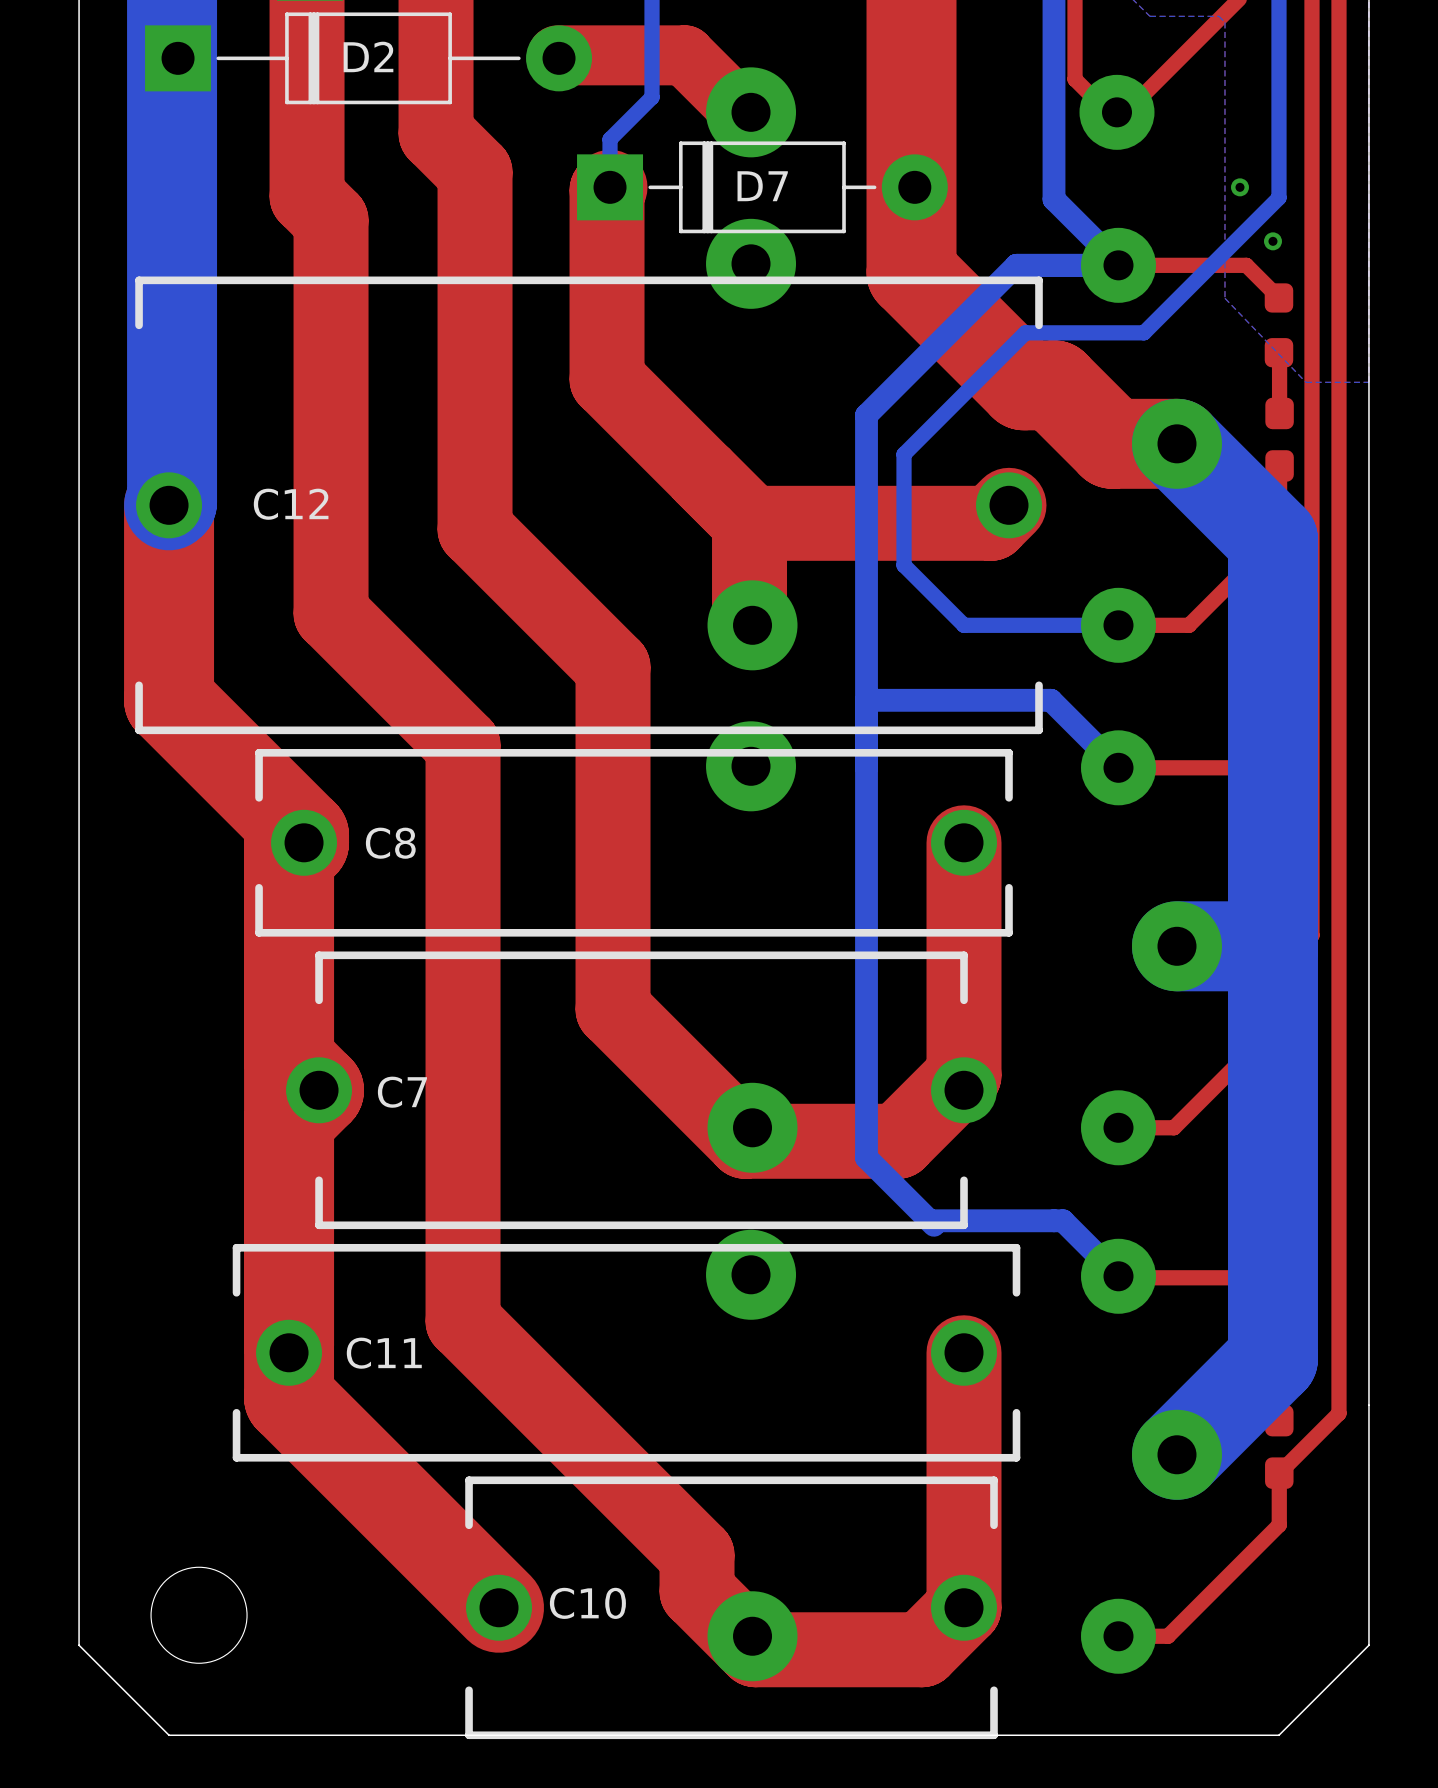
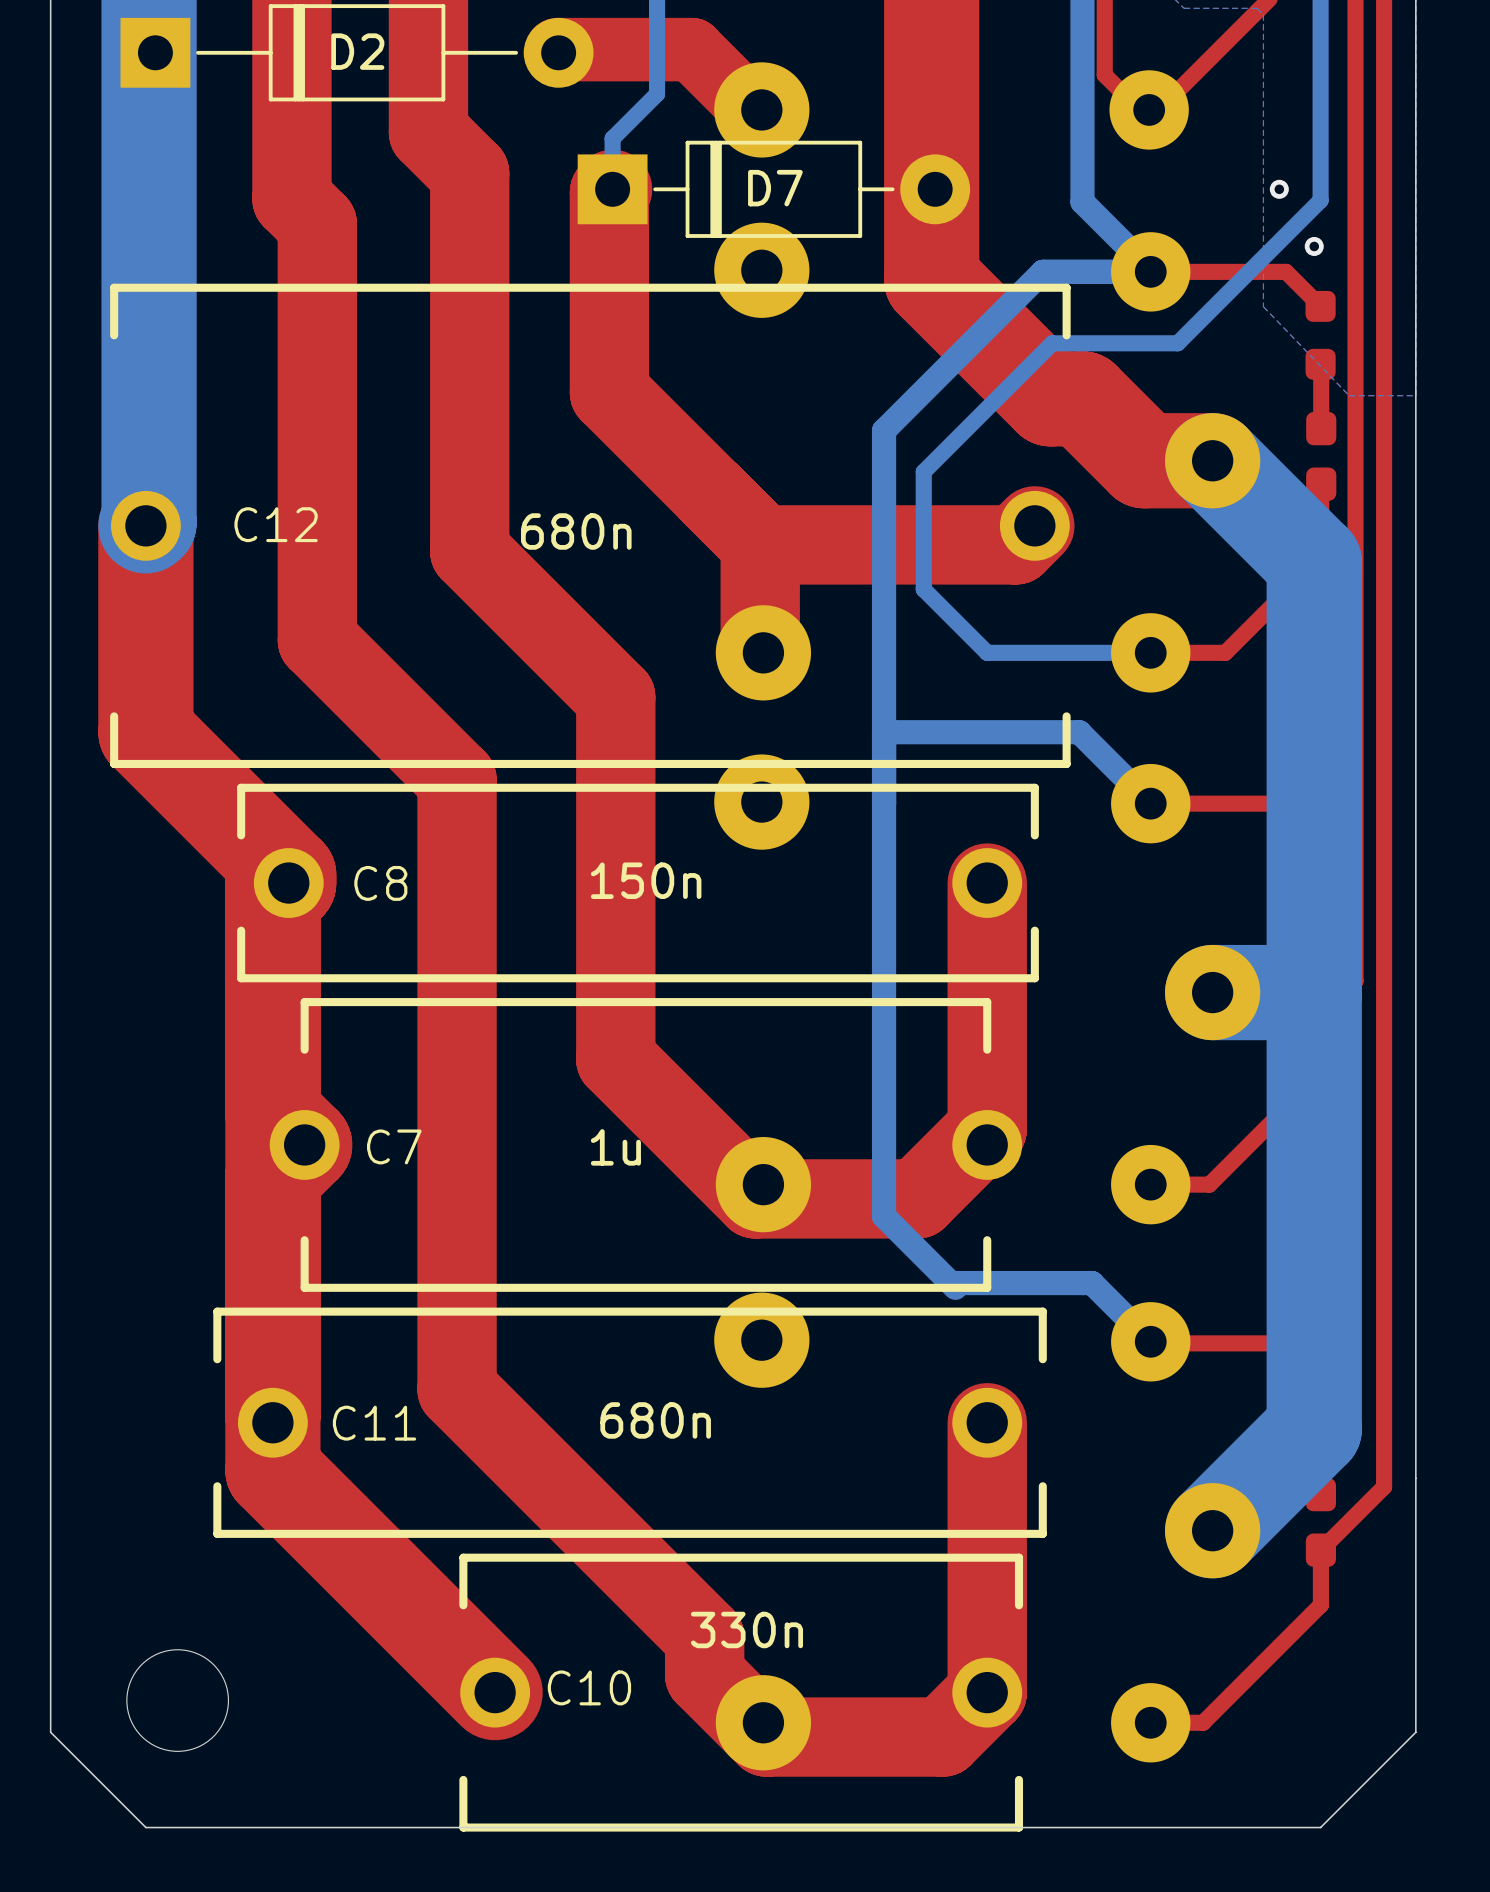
text: none -> 680n (576, 531)
text: none -> 150n (646, 880)
text: none -> 1u (615, 1147)
text: none -> 680n (655, 1420)
text: none -> 330n (746, 1629)

